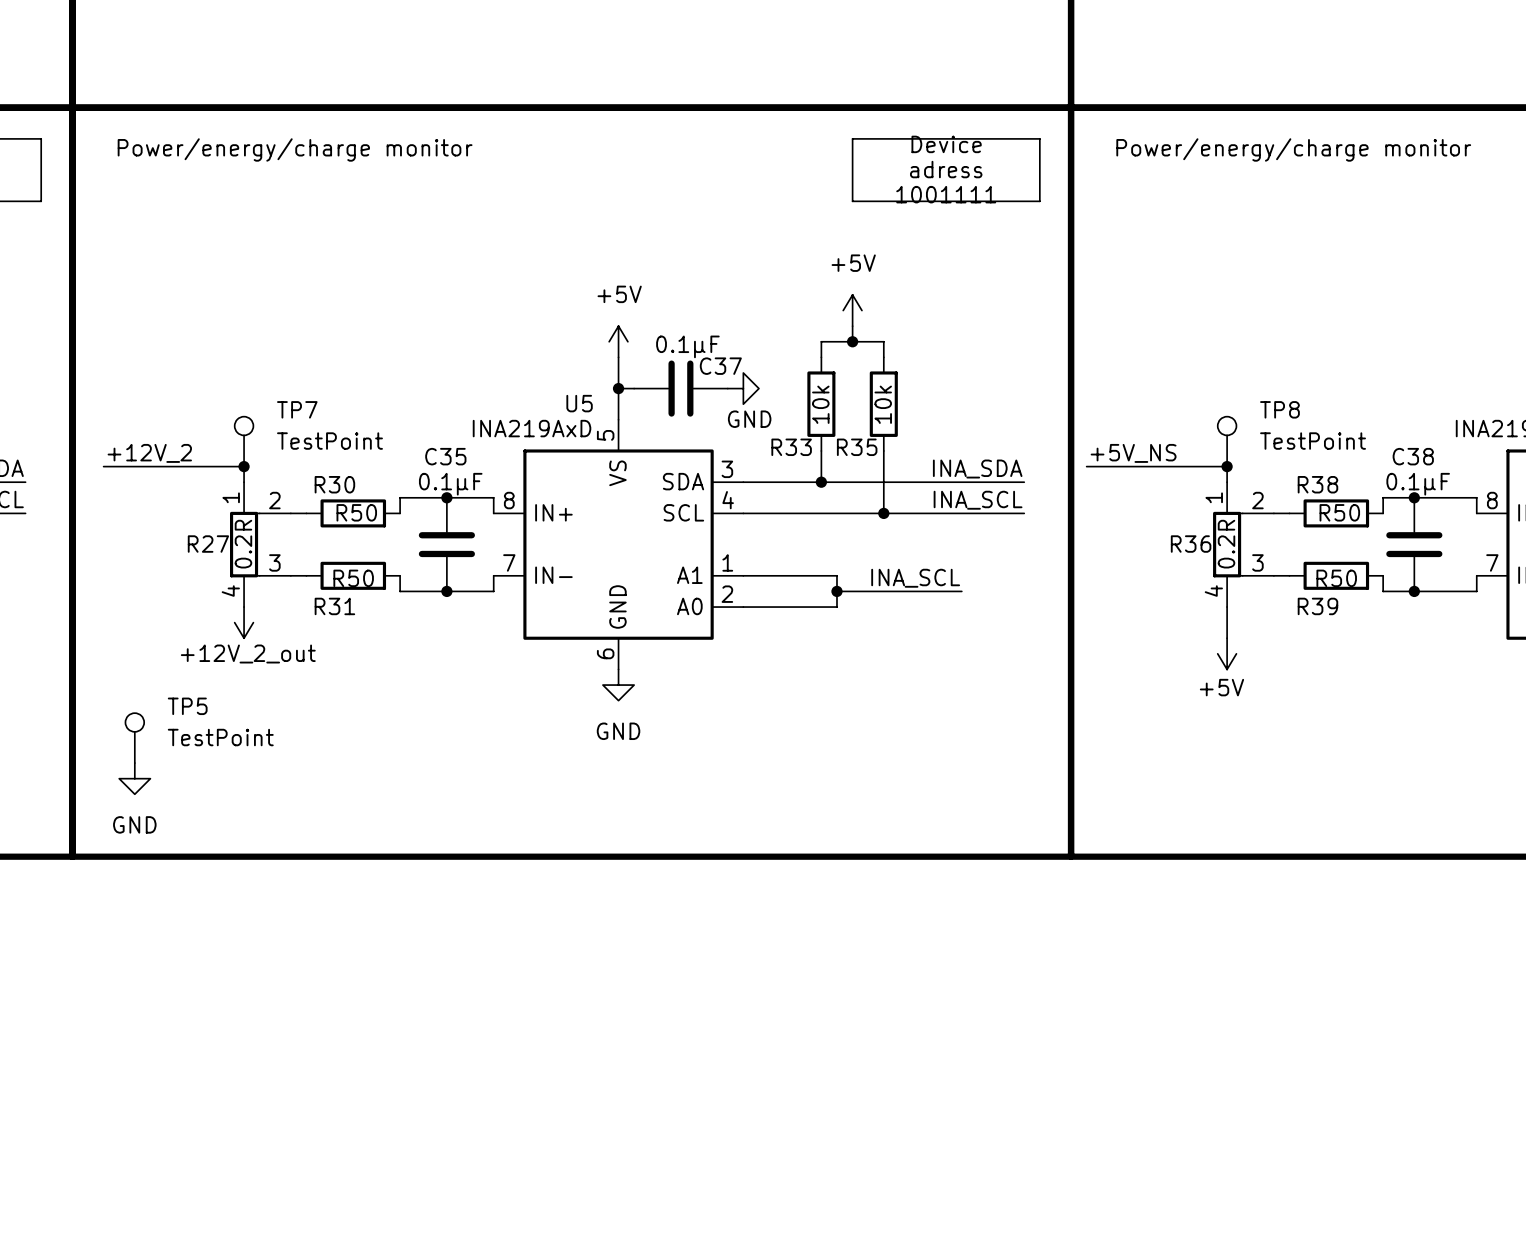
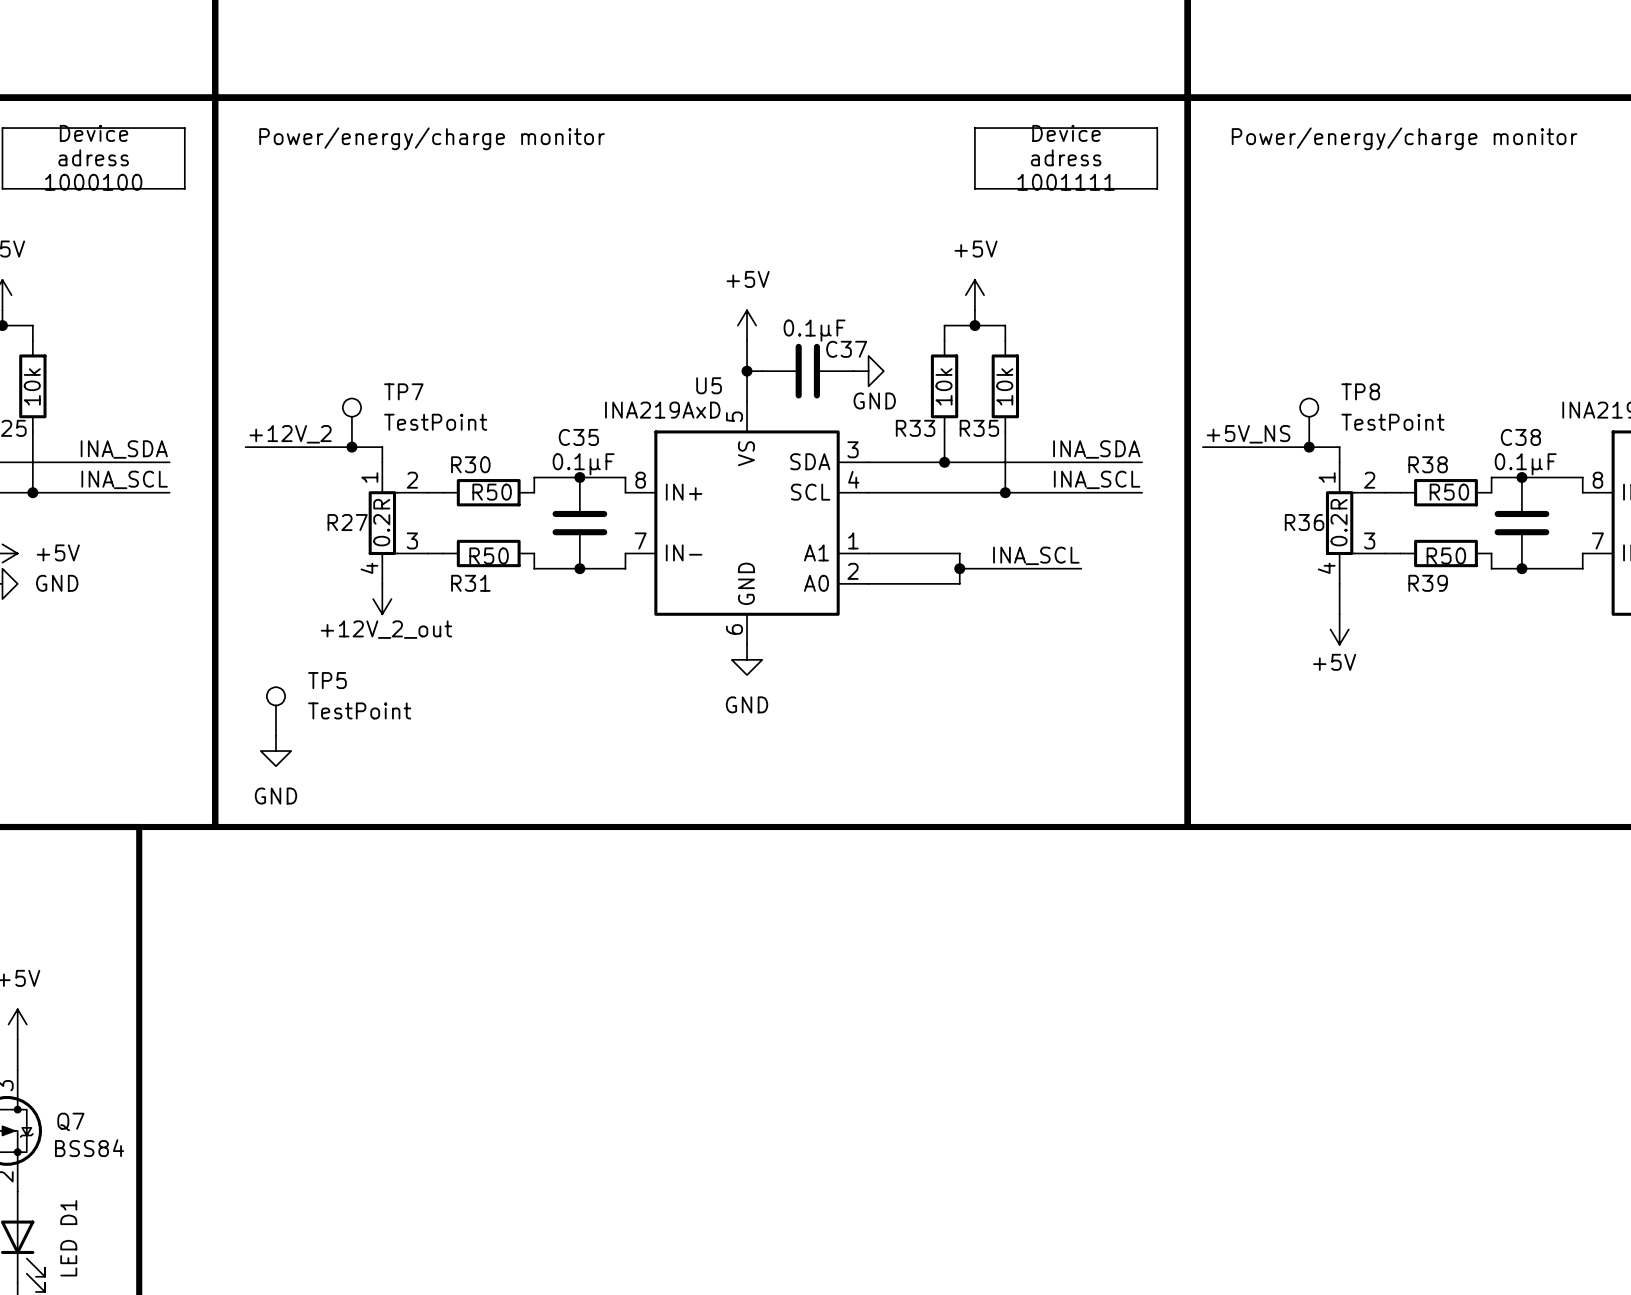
TP7 position: (244, 441) -> (351, 422)
TP8 position: (1227, 441) -> (1309, 422)
junction position: (244, 466) -> (351, 447)
junction position: (1227, 466) -> (1309, 447)

